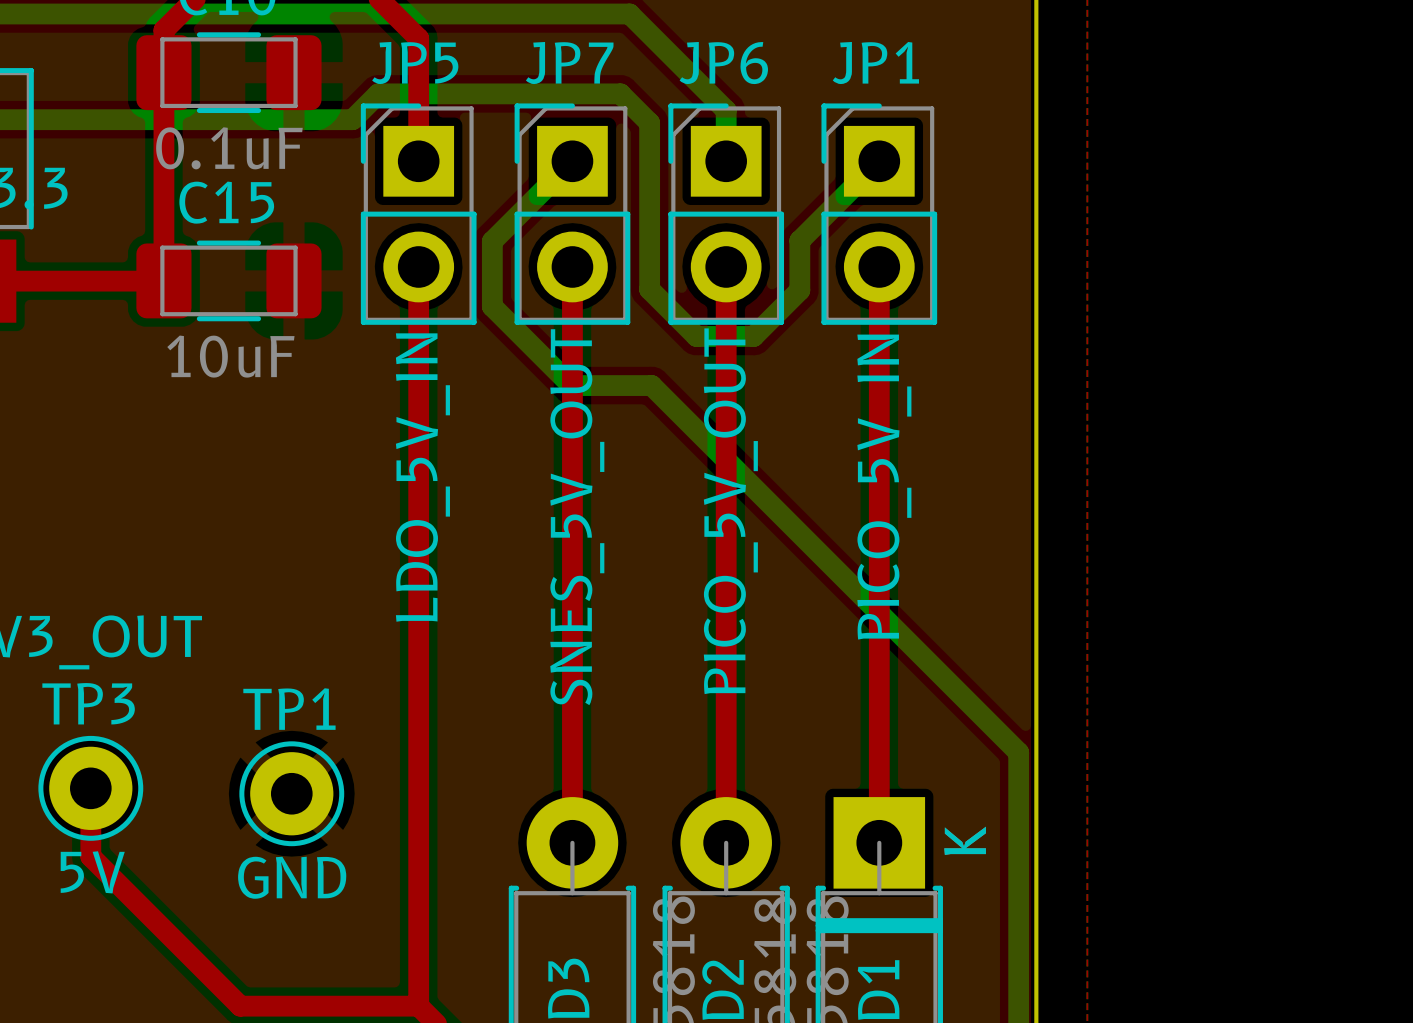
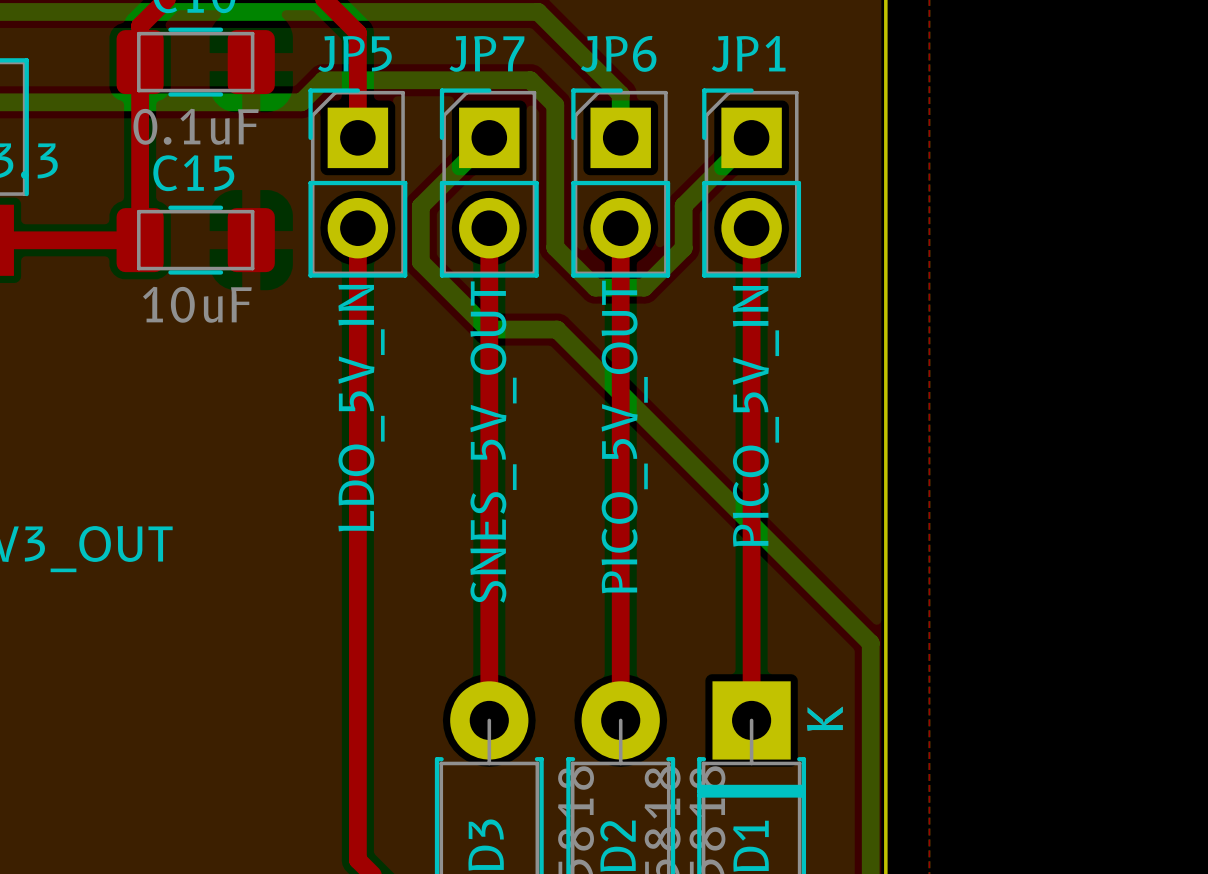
top track: (90, 788) (90, 856) (240, 1006) (418, 1006) -> none
TP3: 5V (90, 788) -> none
TP1: GND (291, 793) -> none

